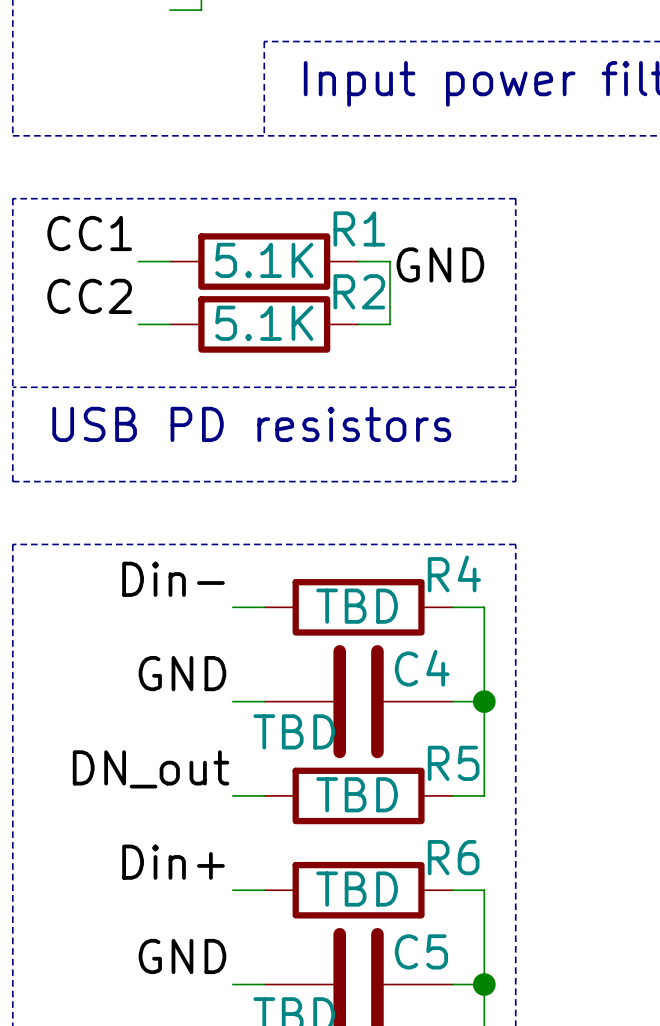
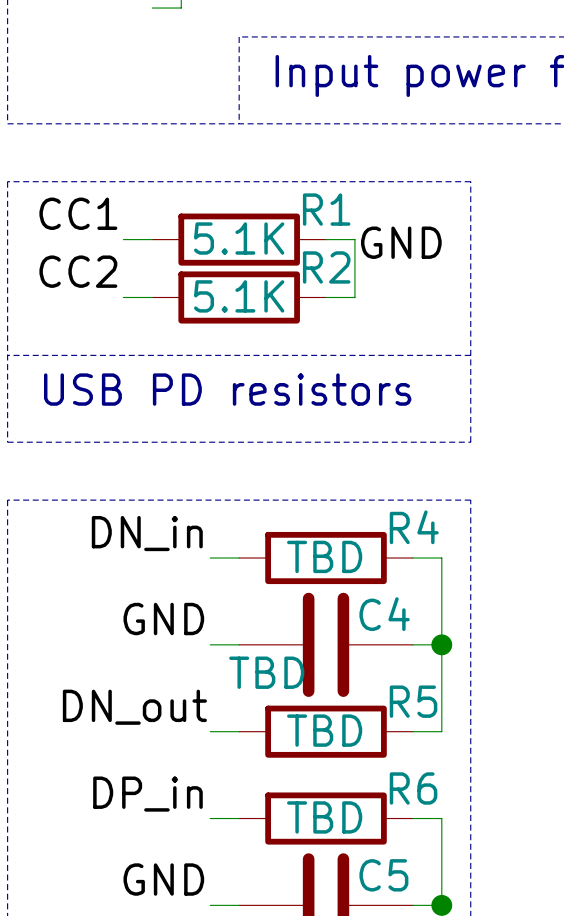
label: Din- (173, 579) -> DN_in (147, 533)
label: Din+ (173, 862) -> DP_in (147, 794)

